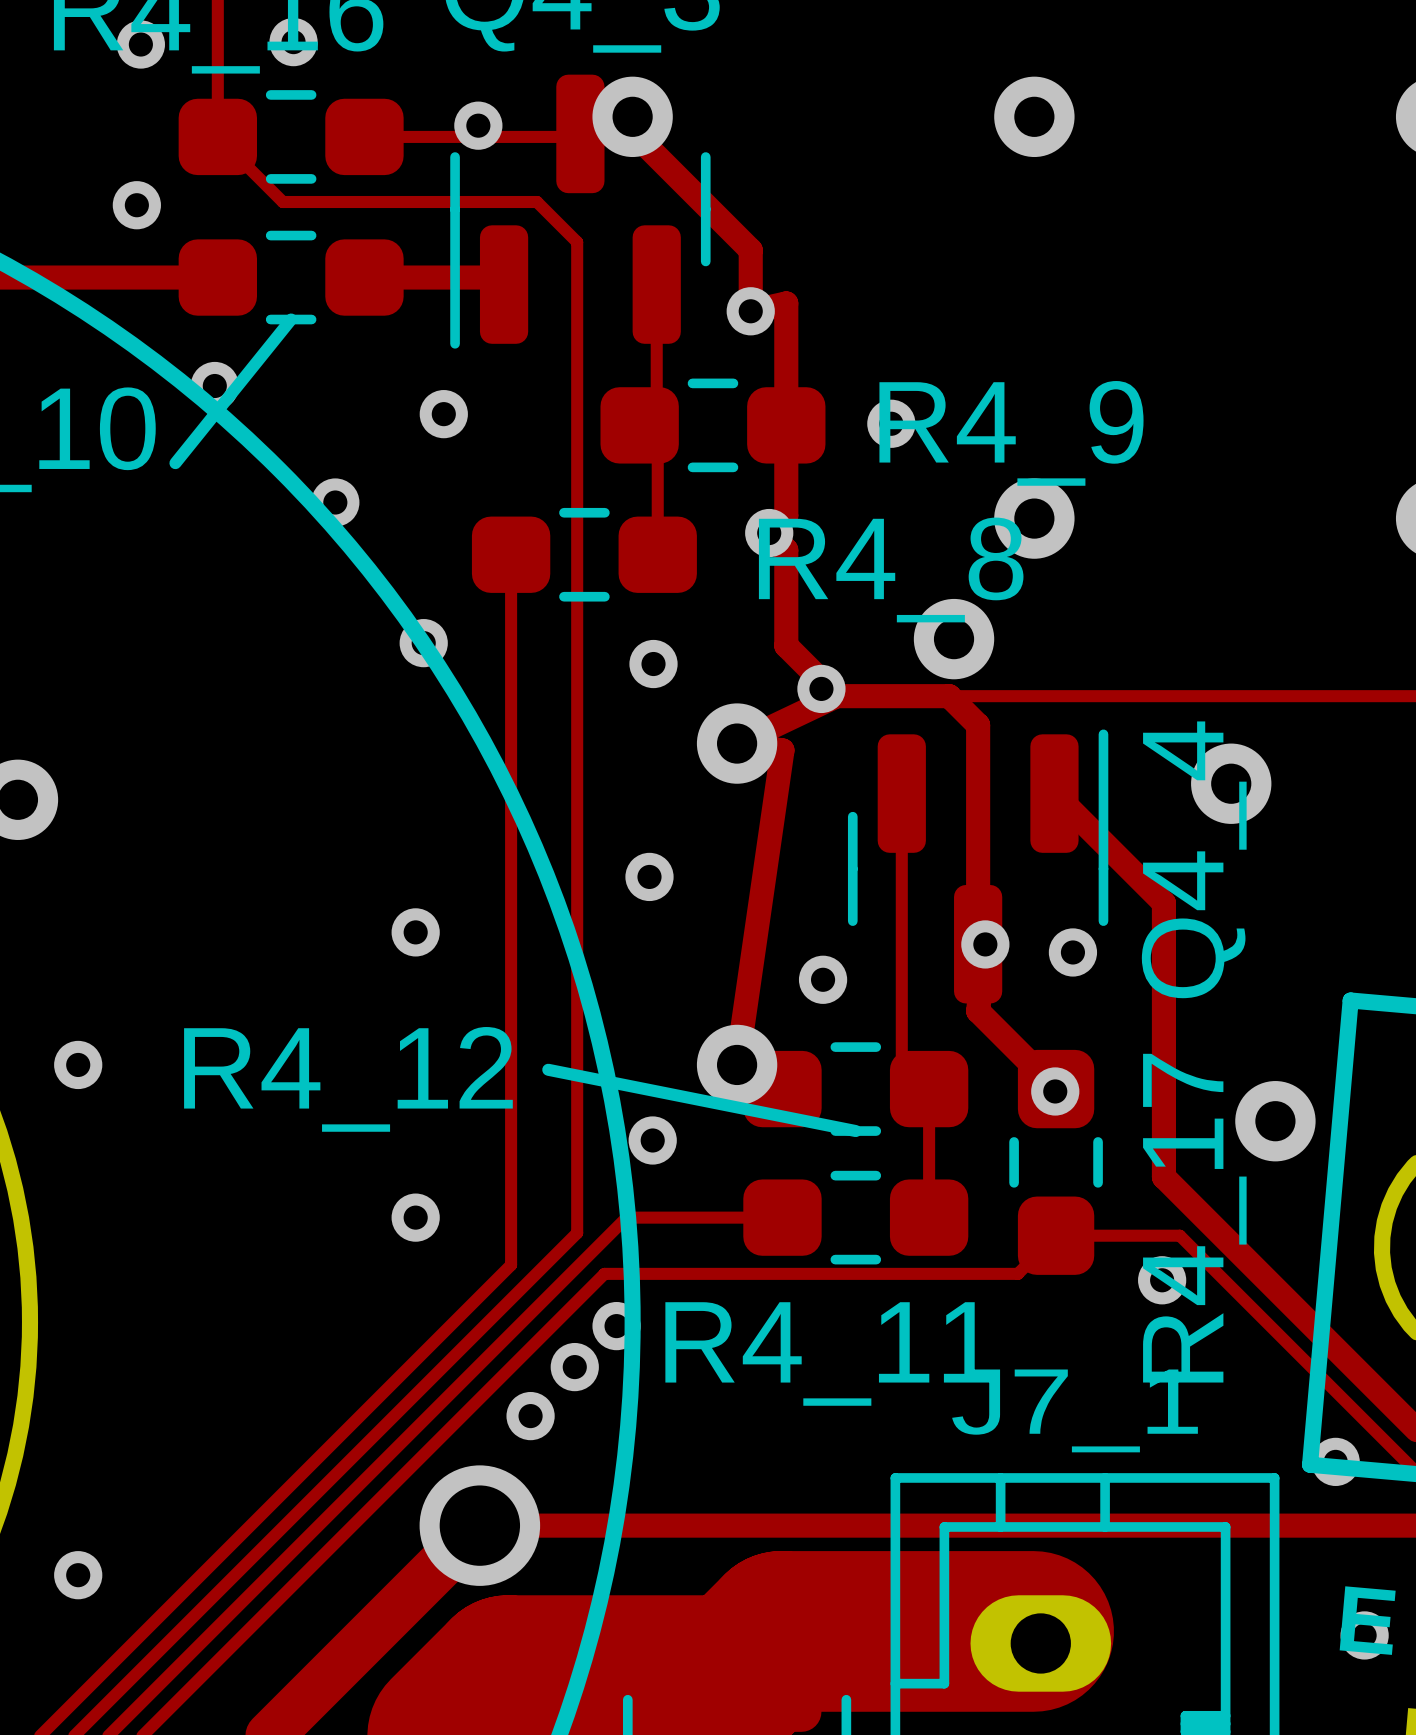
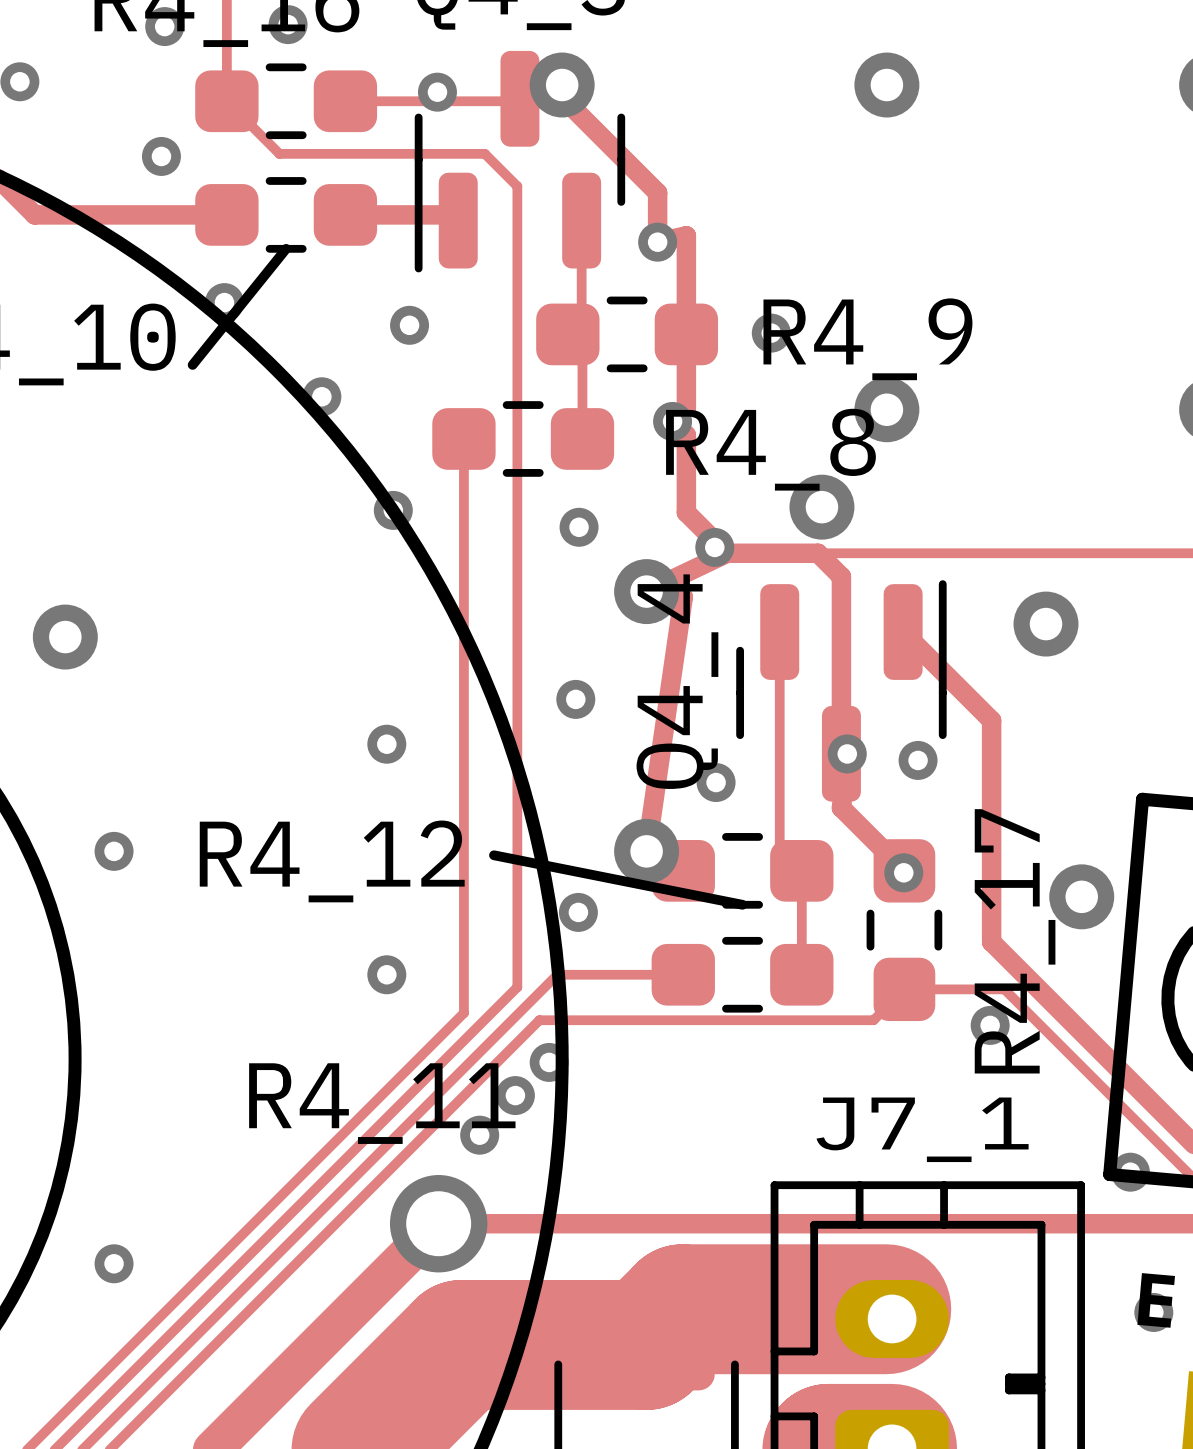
Q4_4 name position: Q4_4 (1194, 859) -> Q4_4 (677, 681)
R4_17 name position: R4_17 (1194, 1218) -> R4_17 (1015, 941)
R4_11 name position: R4_11 (829, 1353) -> R4_11 (382, 1103)

